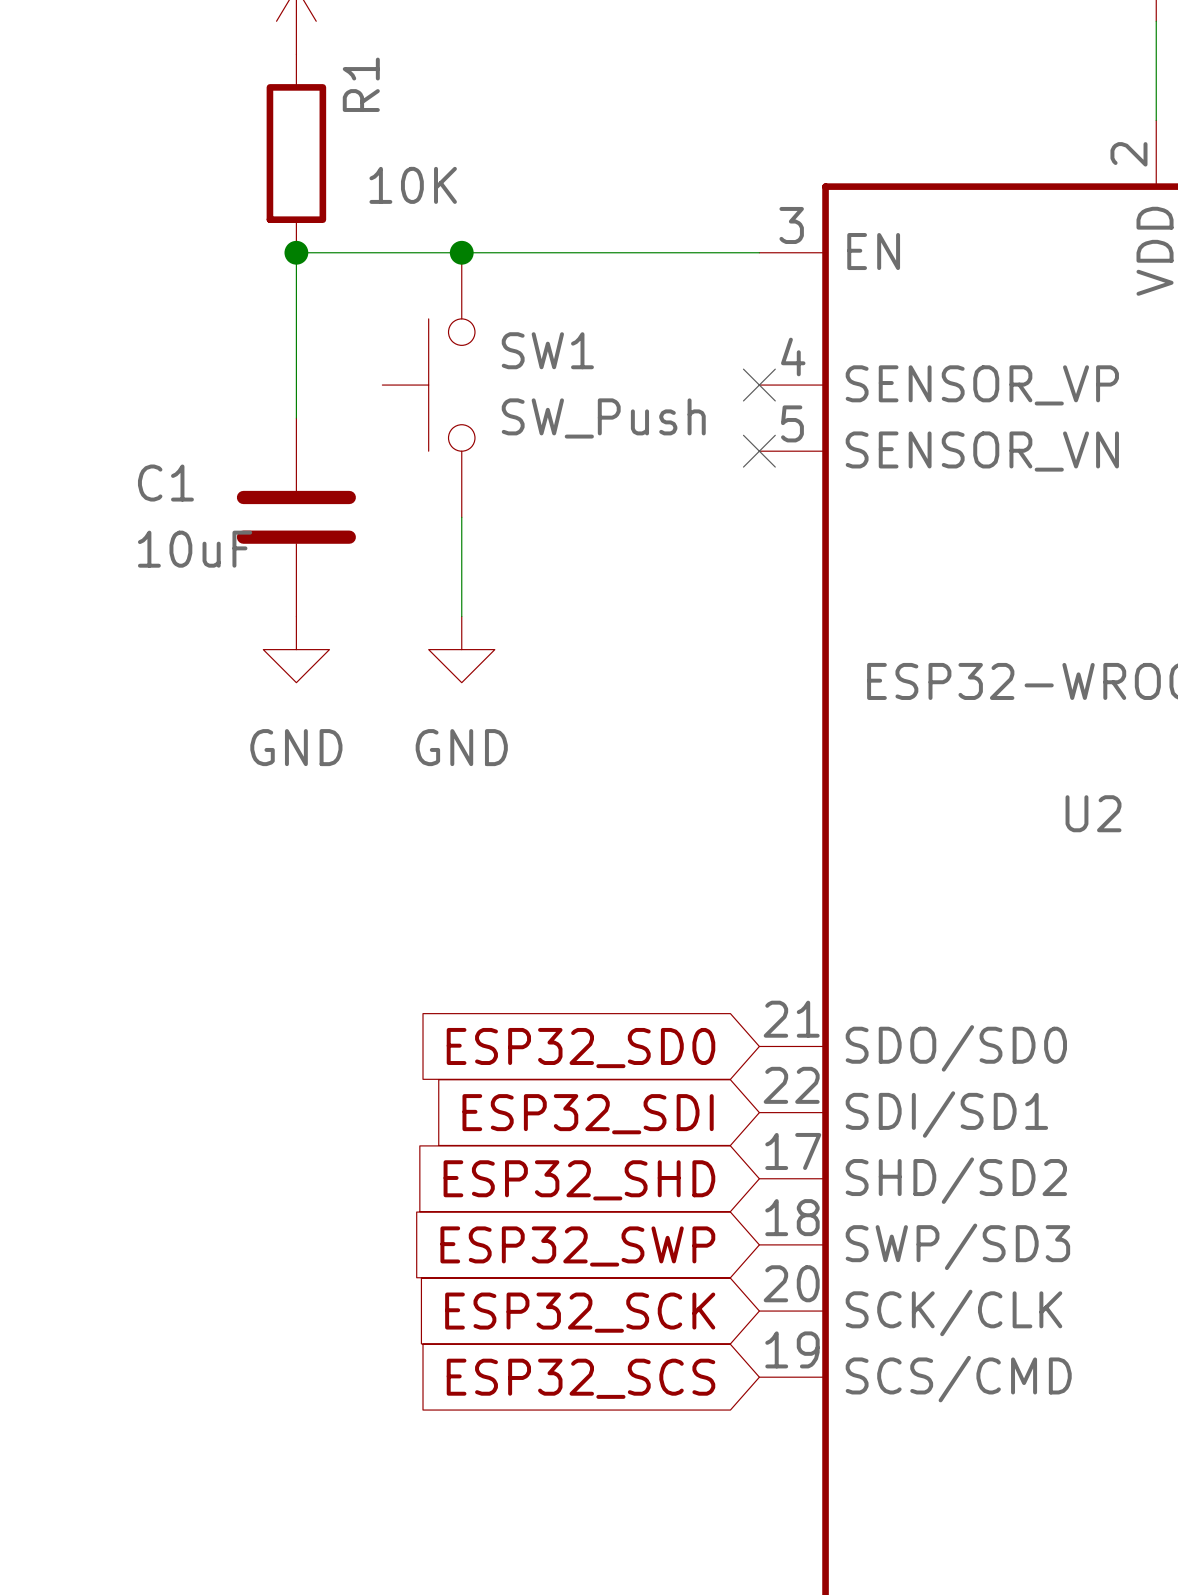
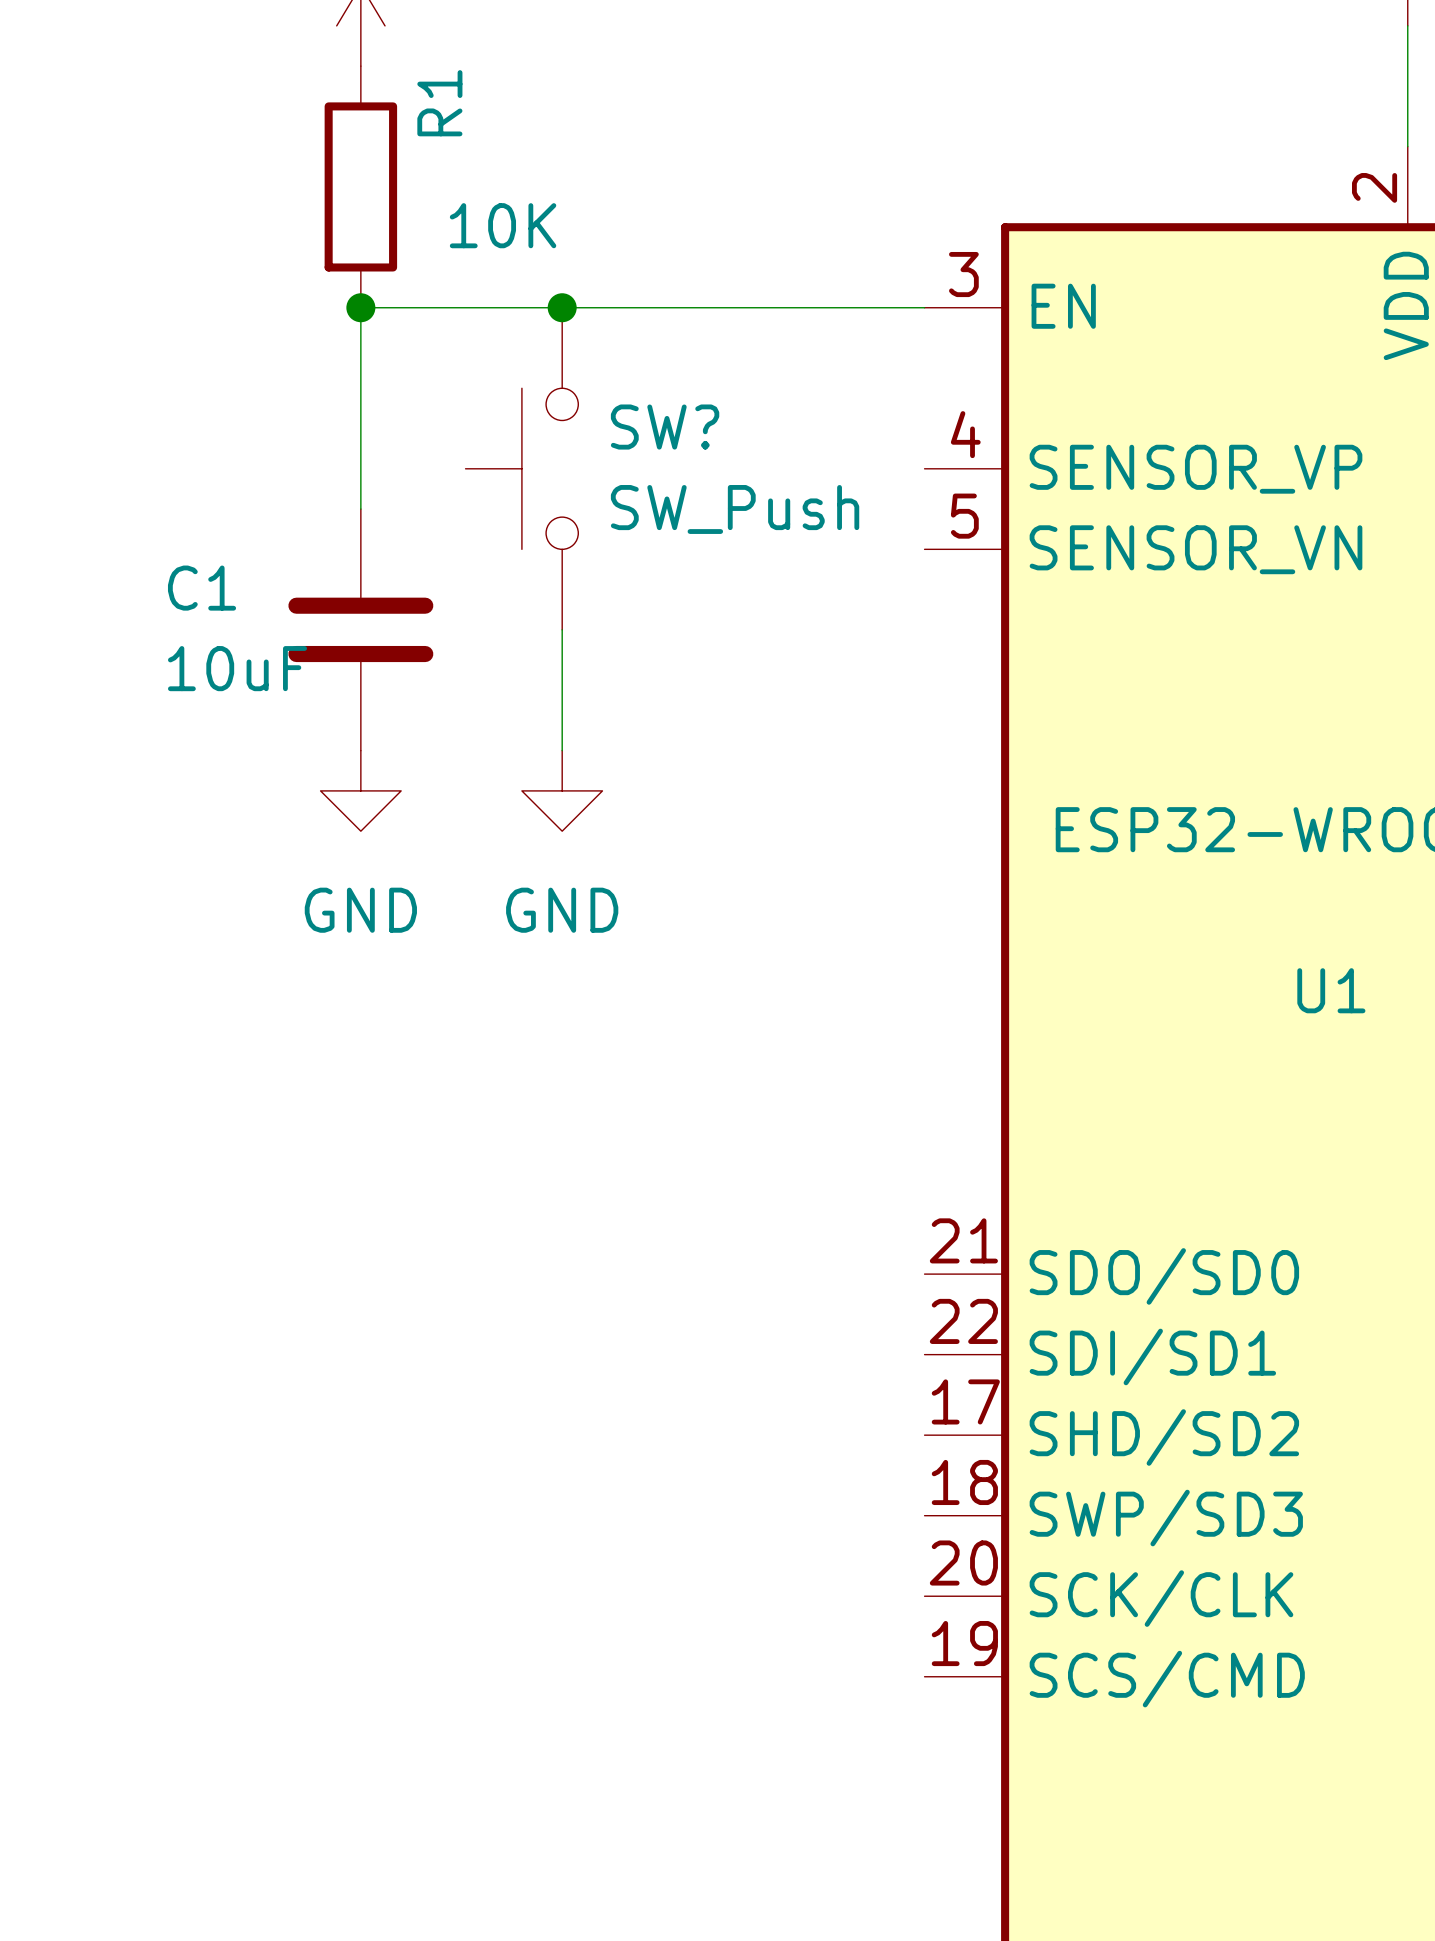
SW1 name: SW1 (547, 350) -> SW? (665, 427)
no-connect mark: (759, 385) -> none
no-connect mark: (759, 451) -> none
U2 name: U2 (1093, 813) -> U1 (1331, 990)
global label: ESP32_SD0 (580, 1048) -> none
global label: ESP32_SDI (588, 1114) -> none
global label: ESP32_SHD (579, 1180) -> none
global label: ESP32_SWP (577, 1246) -> none
global label: ESP32_SCK (580, 1312) -> none
global label: ESP32_SCS (580, 1378) -> none

